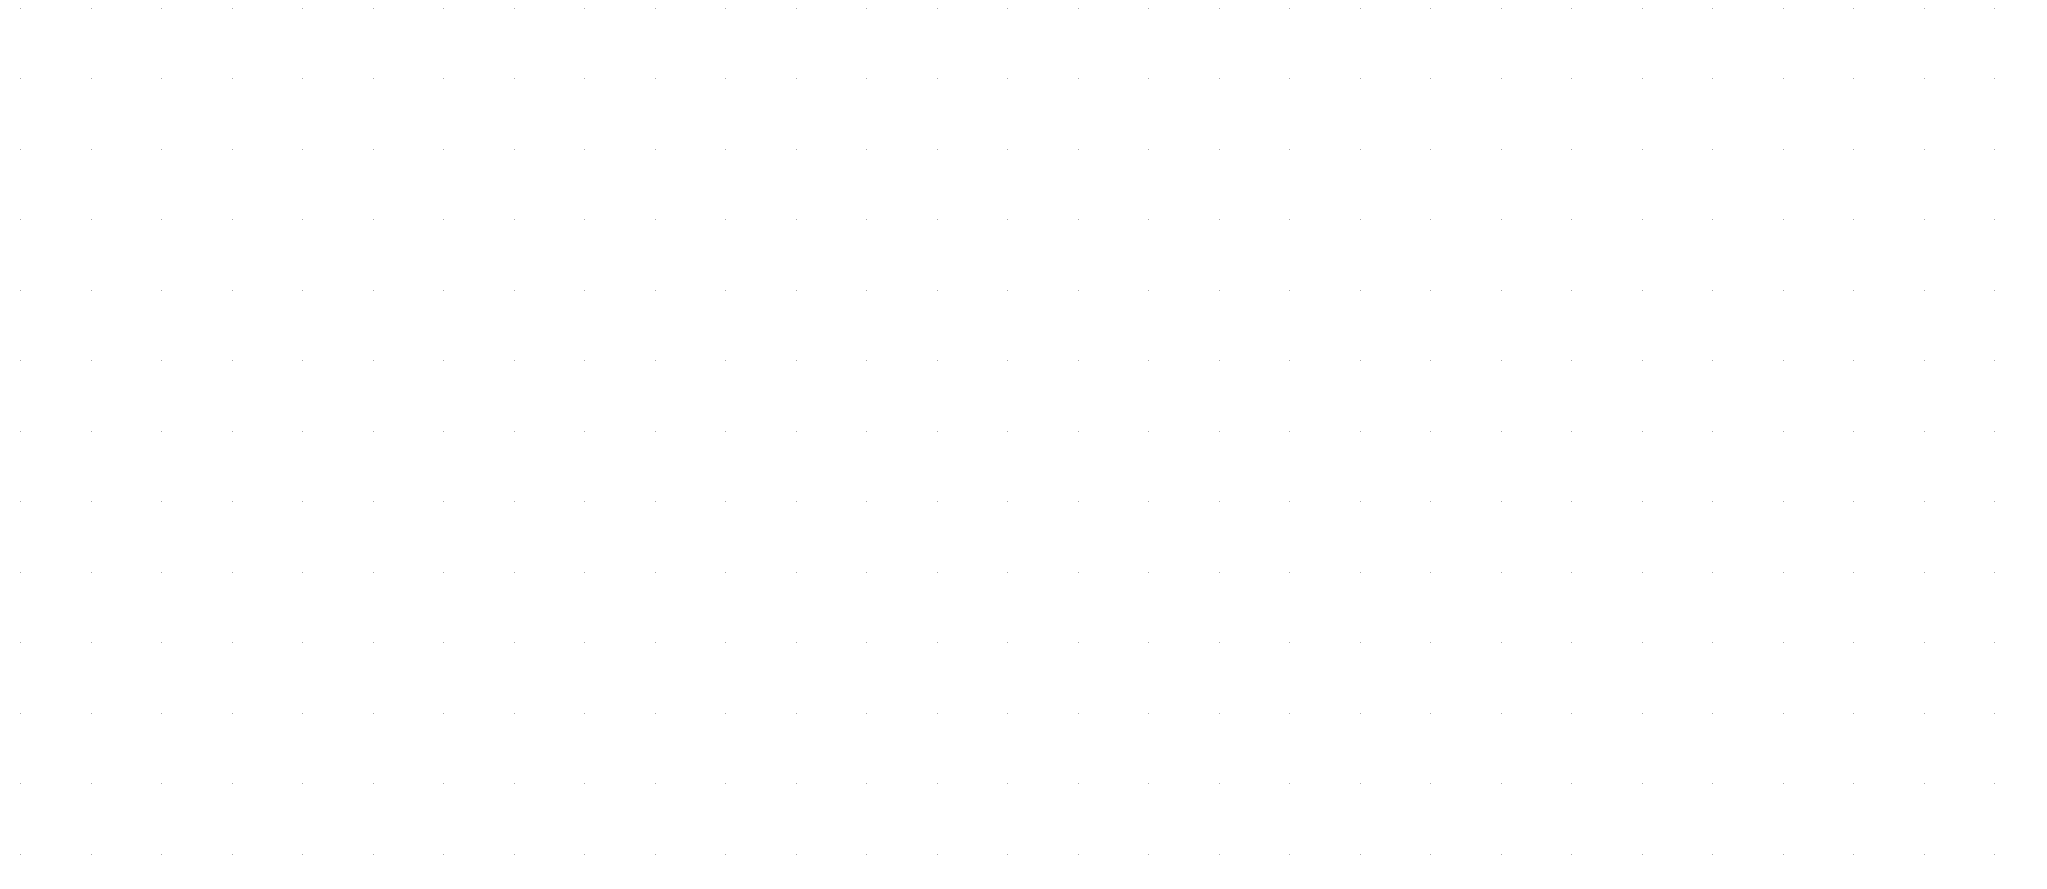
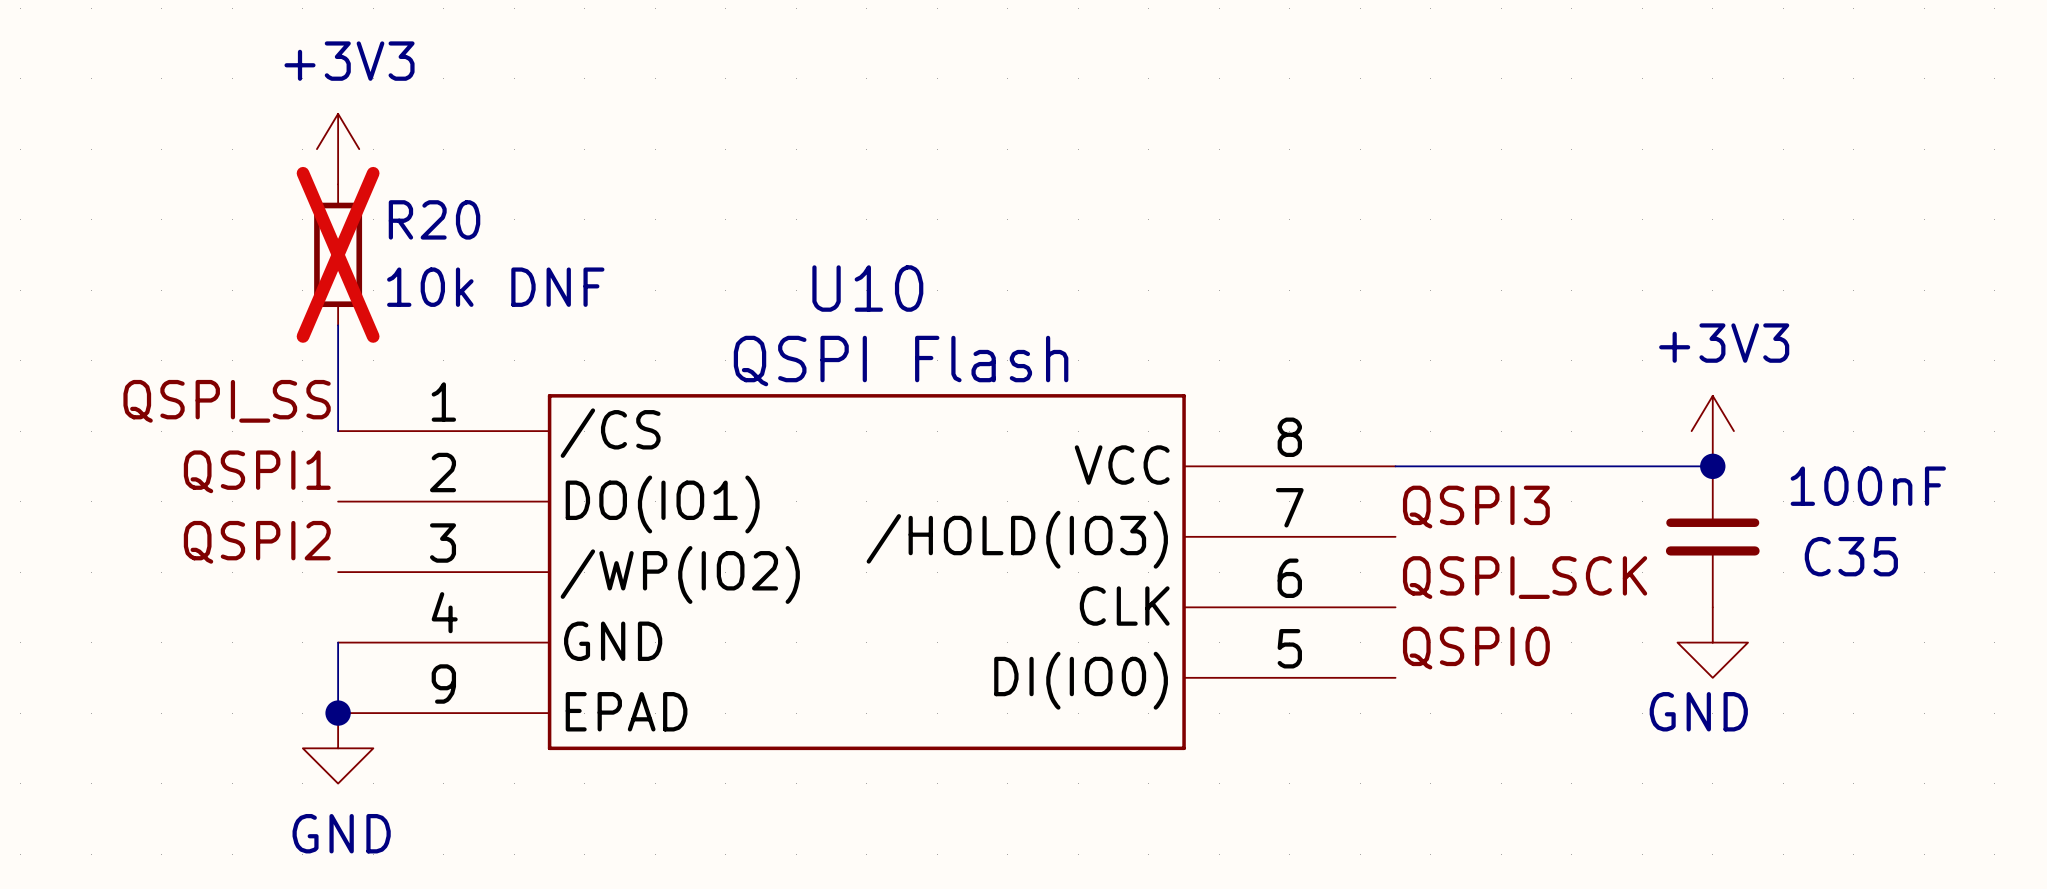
power symbol: none -> +3V3 (338, 149)
R20: none -> 10k DNF (338, 254)
wire: none -> (338, 325) (338, 431)
label: none -> QSPI_SS (227, 401)
power symbol: none -> +3V3 (1712, 431)
wire: none -> (1395, 466) (1712, 466)
junction: none -> (1712, 466)
label: none -> QSPI1 (257, 471)
label: none -> QSPI3 (1476, 507)
C35: none -> 100nF (1712, 536)
label: none -> QSPI2 (257, 542)
U10: none -> QSPI Flash (866, 572)
label: none -> QSPI_SCK (1525, 577)
wire: none -> (338, 642) (338, 713)
power symbol: none -> GND (1712, 642)
label: none -> QSPI0 (1476, 648)
junction: none -> (338, 713)
power symbol: none -> GND (338, 748)

